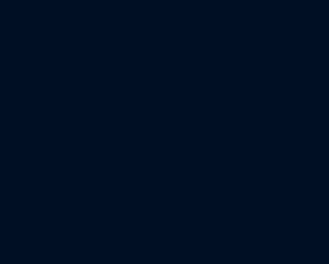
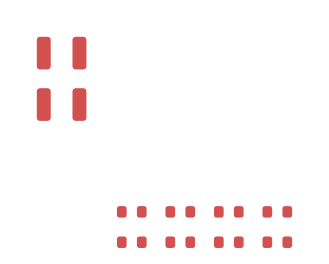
part: none -> (61, 53)
part: none -> (61, 104)
part: none -> (131, 211)
part: none -> (180, 211)
part: none -> (228, 211)
part: none -> (277, 211)
part: none -> (131, 242)
part: none -> (180, 242)
part: none -> (228, 242)
part: none -> (277, 242)

